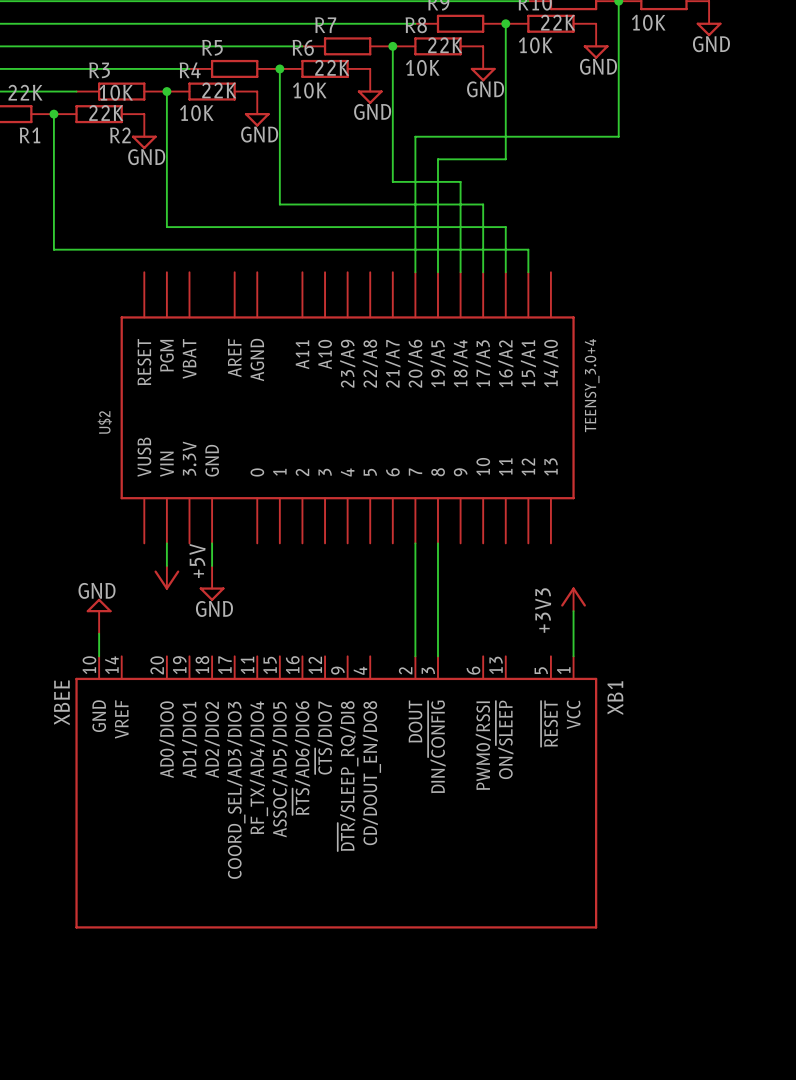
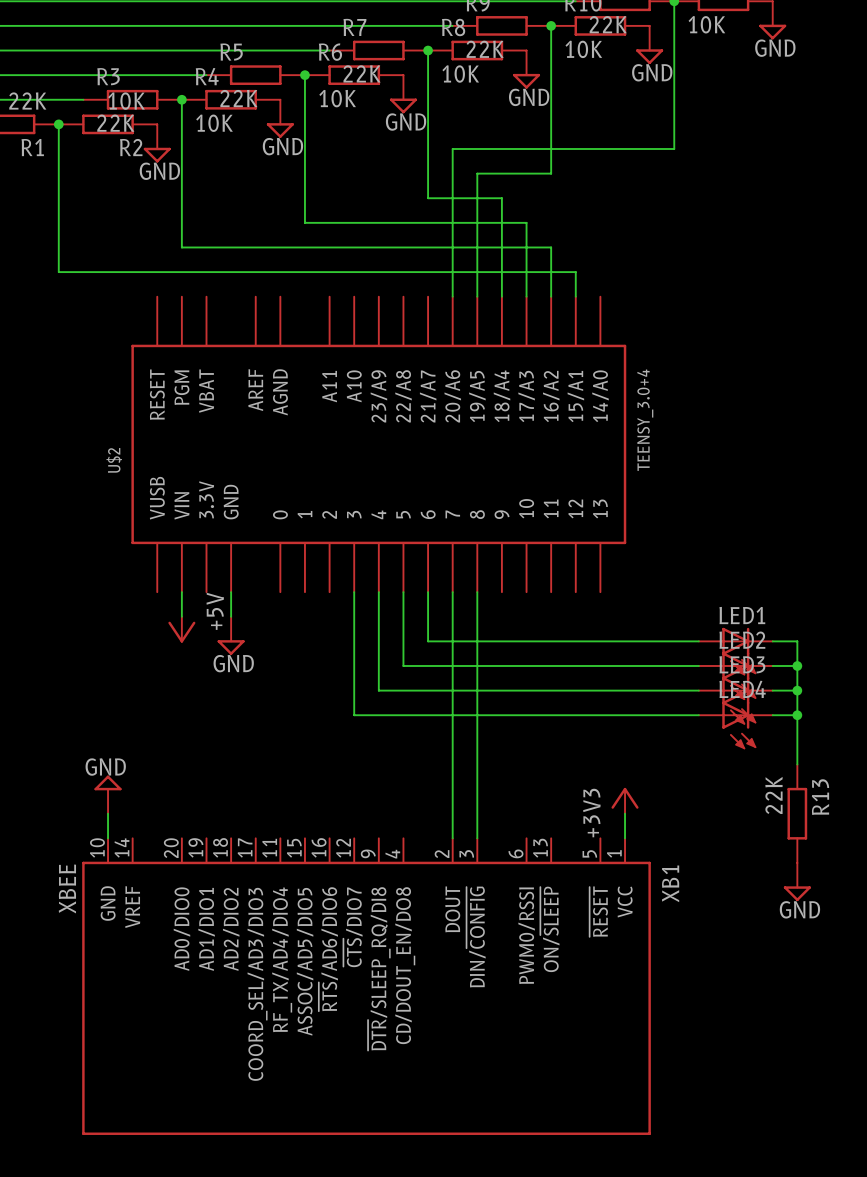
wire: none -> (354, 592) (354, 715) (698, 715)
wire: none -> (378, 592) (378, 690) (698, 690)
wire: none -> (403, 592) (403, 665) (698, 665)
wire: none -> (428, 592) (428, 641) (698, 641)
wire: none -> (772, 641) (797, 641) (797, 764)
LED1: none -> (735, 651)
power symbol position: +3V3 (573, 599) -> +3V3 (625, 800)
wire: (573, 611) (573, 656) -> none
wire: none -> (772, 665) (797, 665)
junction: none -> (797, 665)
power symbol position: GND (99, 616) -> GND (108, 794)
LED2: none -> (735, 676)
wire: (99, 633) (99, 656) -> (108, 813) (108, 838)
wire: none -> (772, 690) (797, 690)
junction: none -> (797, 690)
LED3: none -> (735, 700)
wire: none -> (452, 715) (452, 838)
wire: none -> (477, 715) (477, 838)
wire: none -> (772, 715) (797, 715)
junction: none -> (797, 715)
LED4: none -> (735, 725)
wire: none -> (625, 813) (625, 838)
R13: none -> 22K (797, 813)
XB1 position: (336, 792) -> (366, 986)
power symbol: none -> GND (797, 882)

